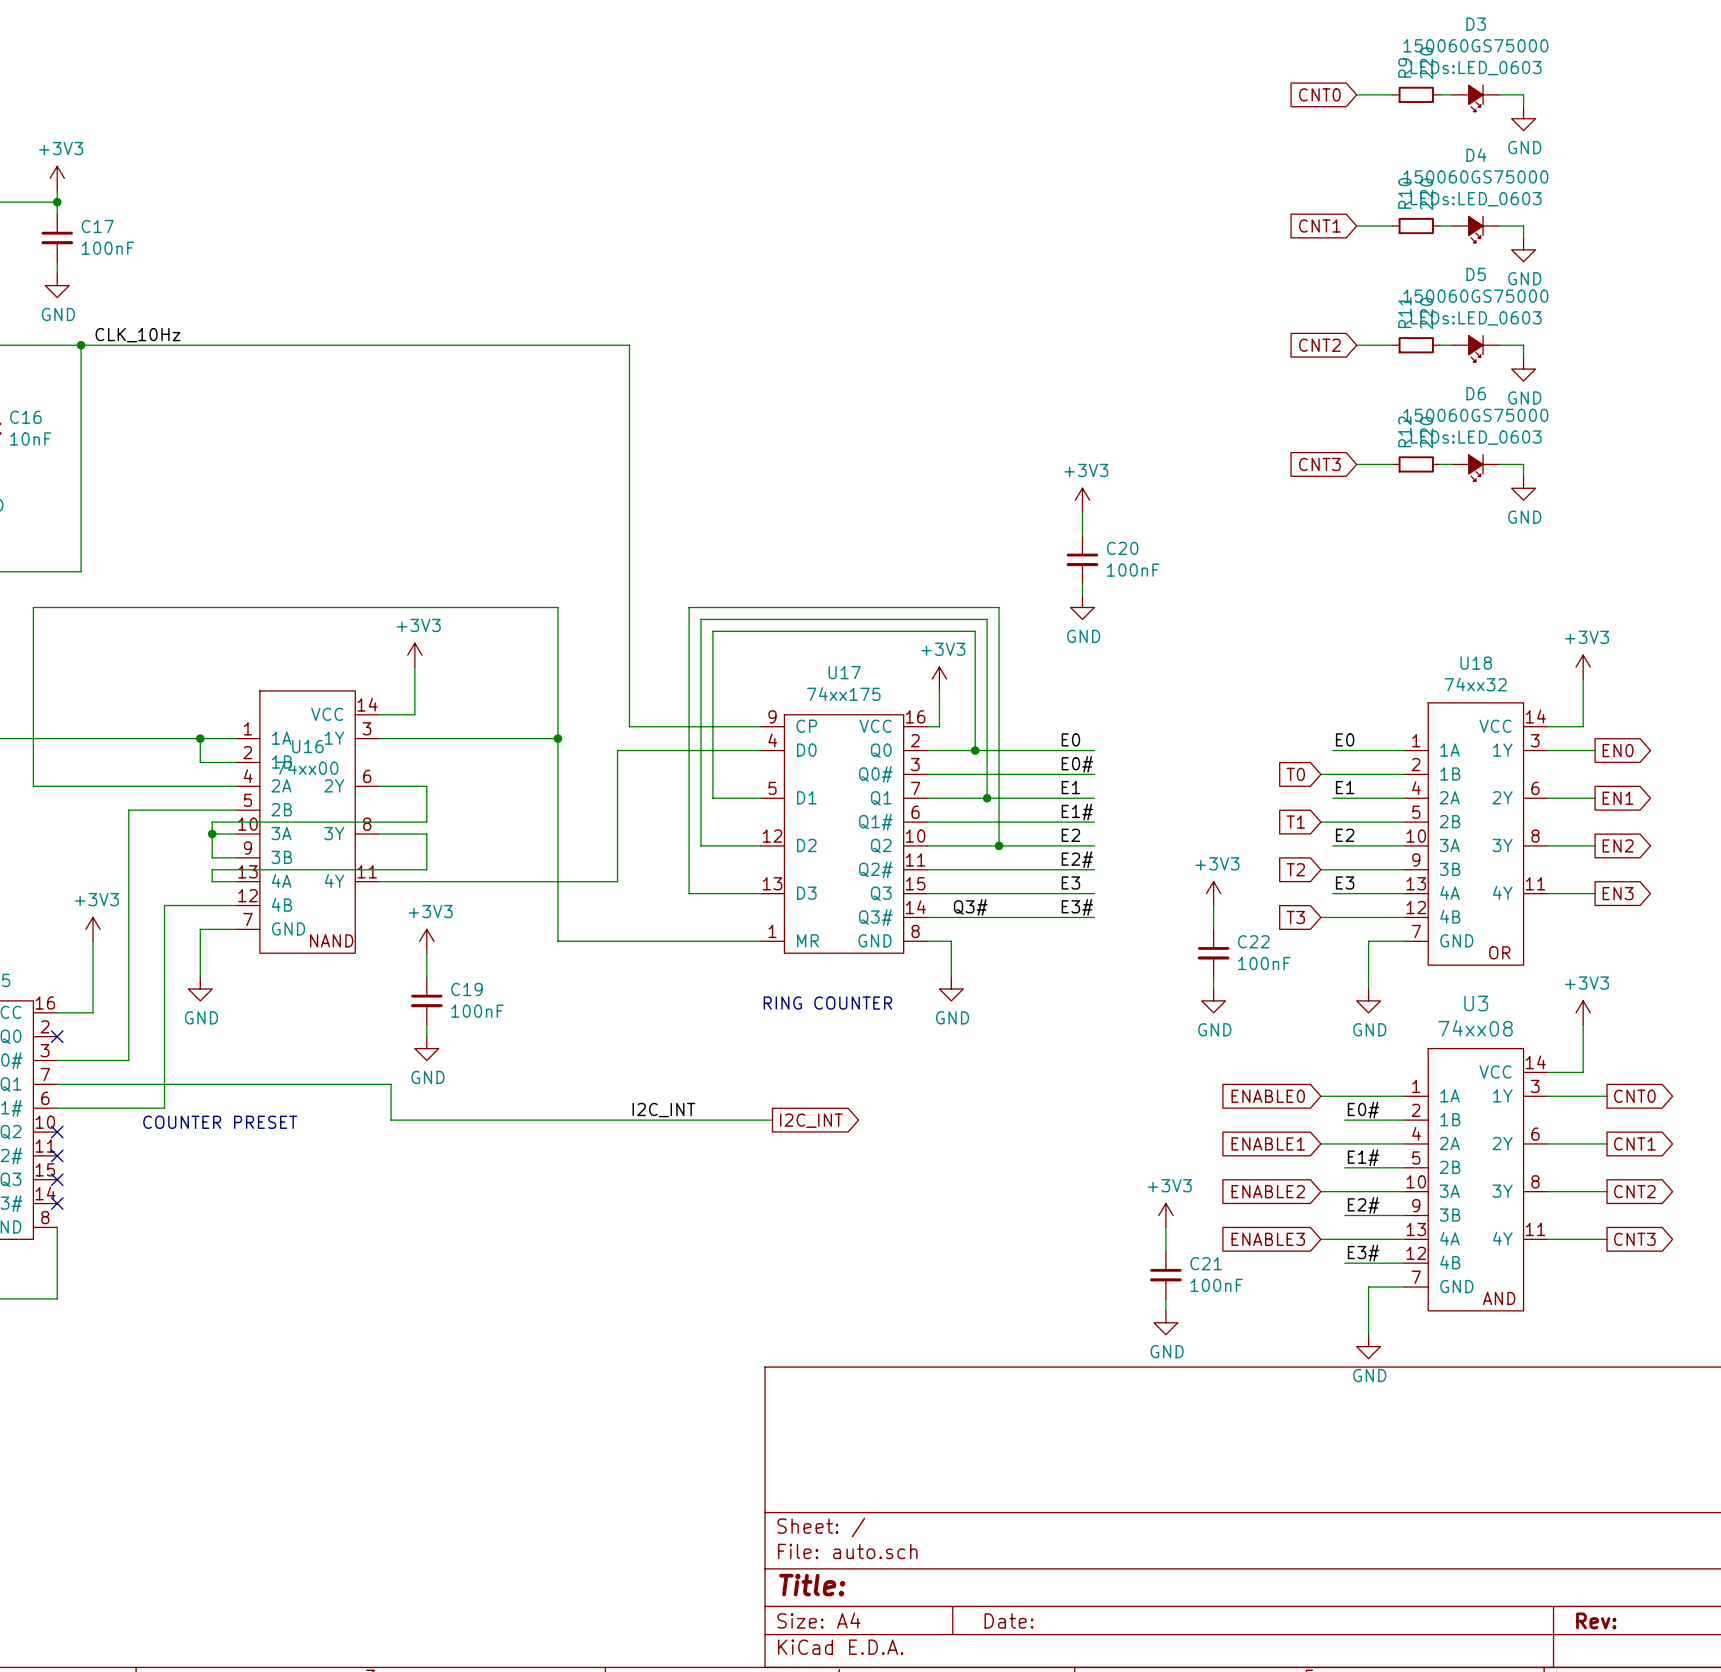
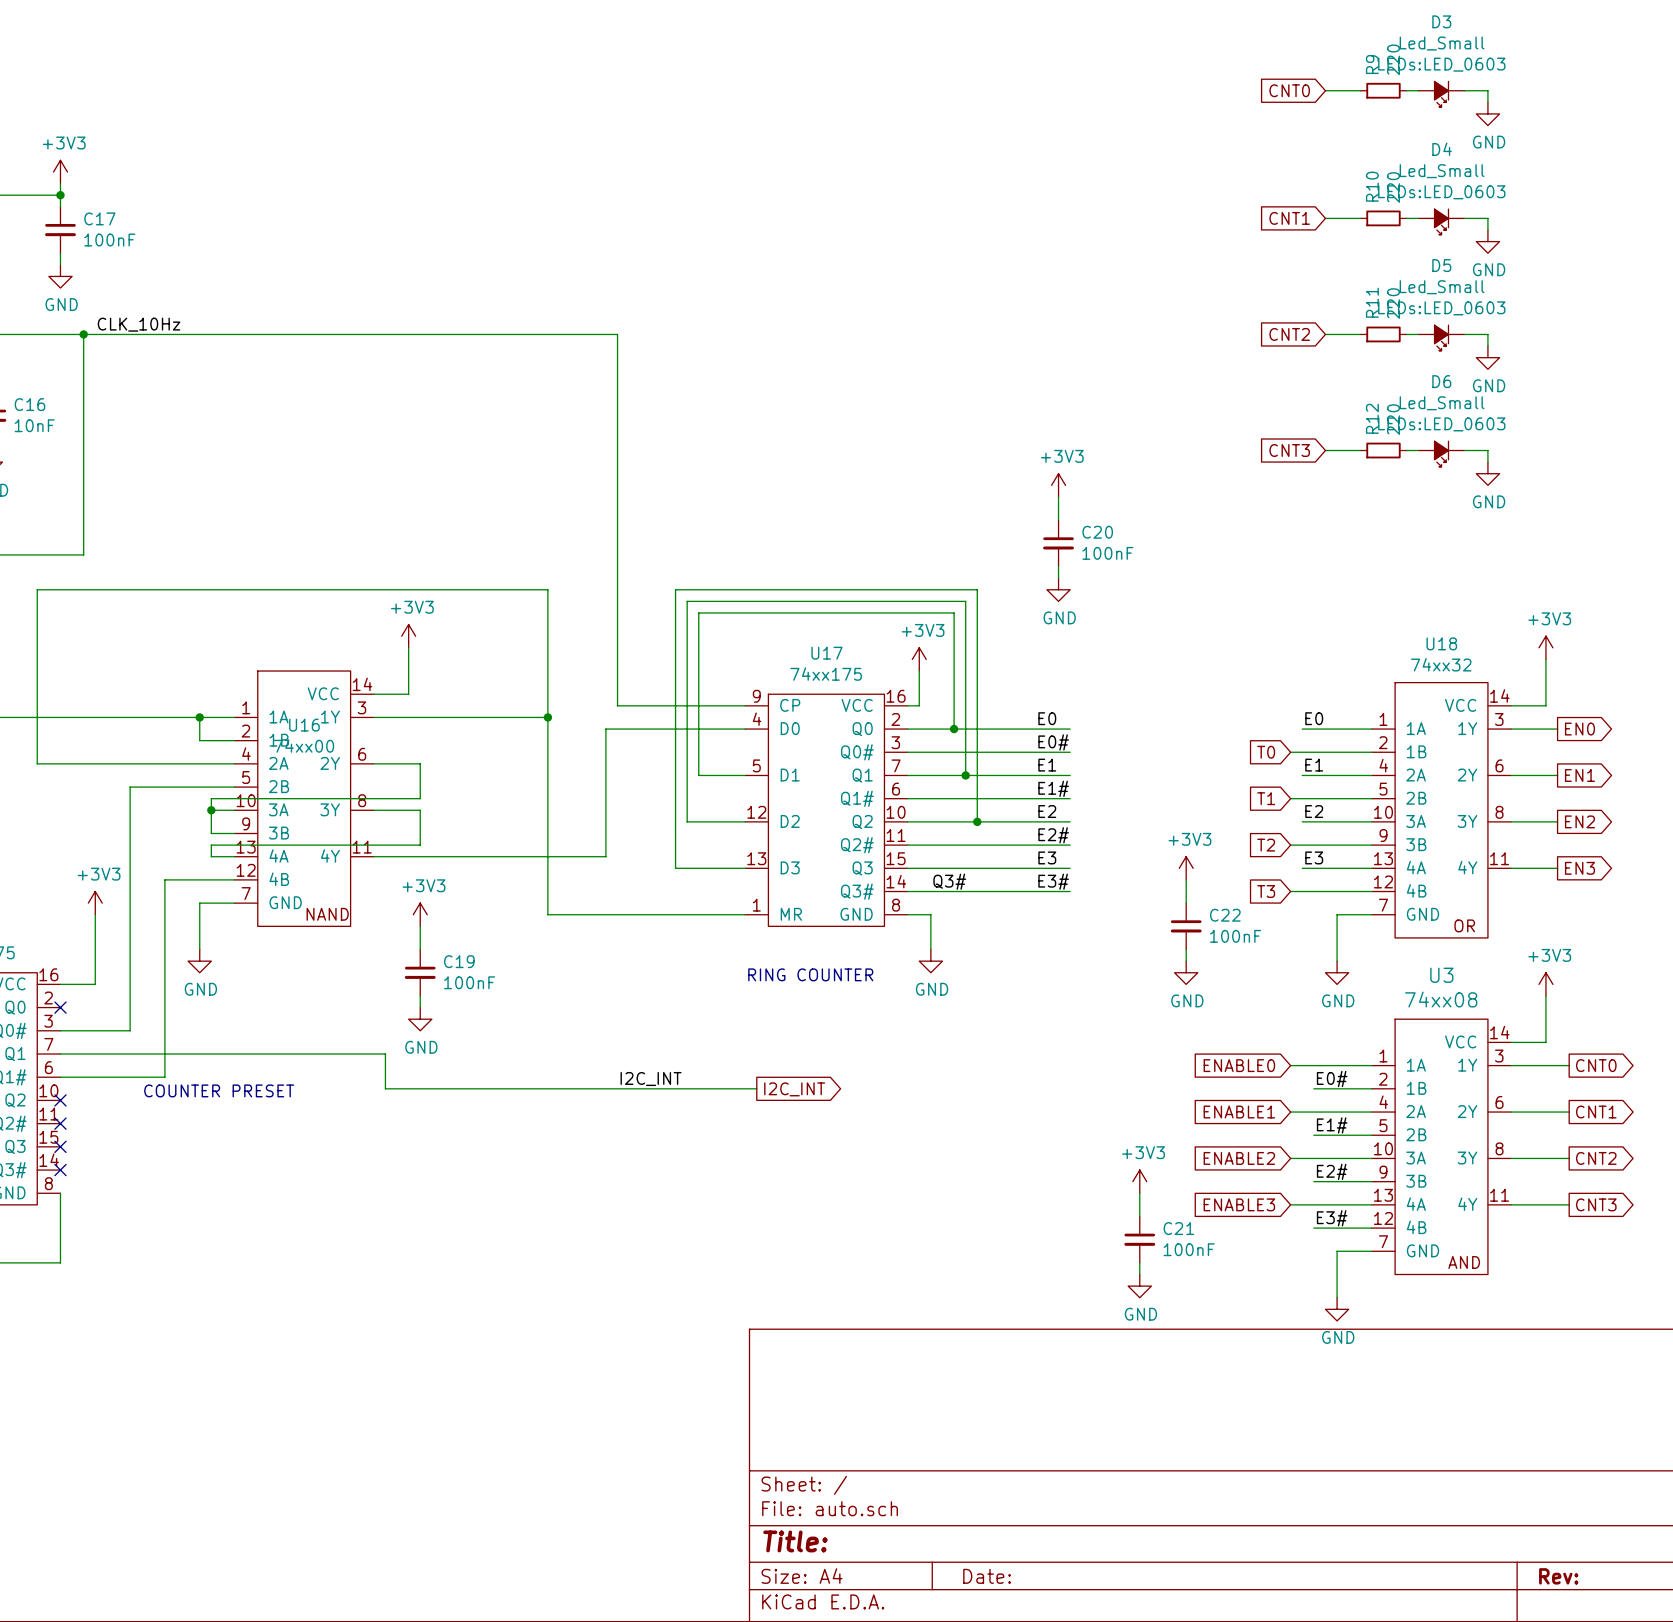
D3 value: 150060GS75000 (1475, 45) -> Led_Small (1442, 43)
D4 value: 150060GS75000 (1475, 176) -> Led_Small (1442, 171)
D5 value: 150060GS75000 (1475, 296) -> Led_Small (1442, 287)
D6 value: 150060GS75000 (1475, 415) -> Led_Small (1442, 403)

